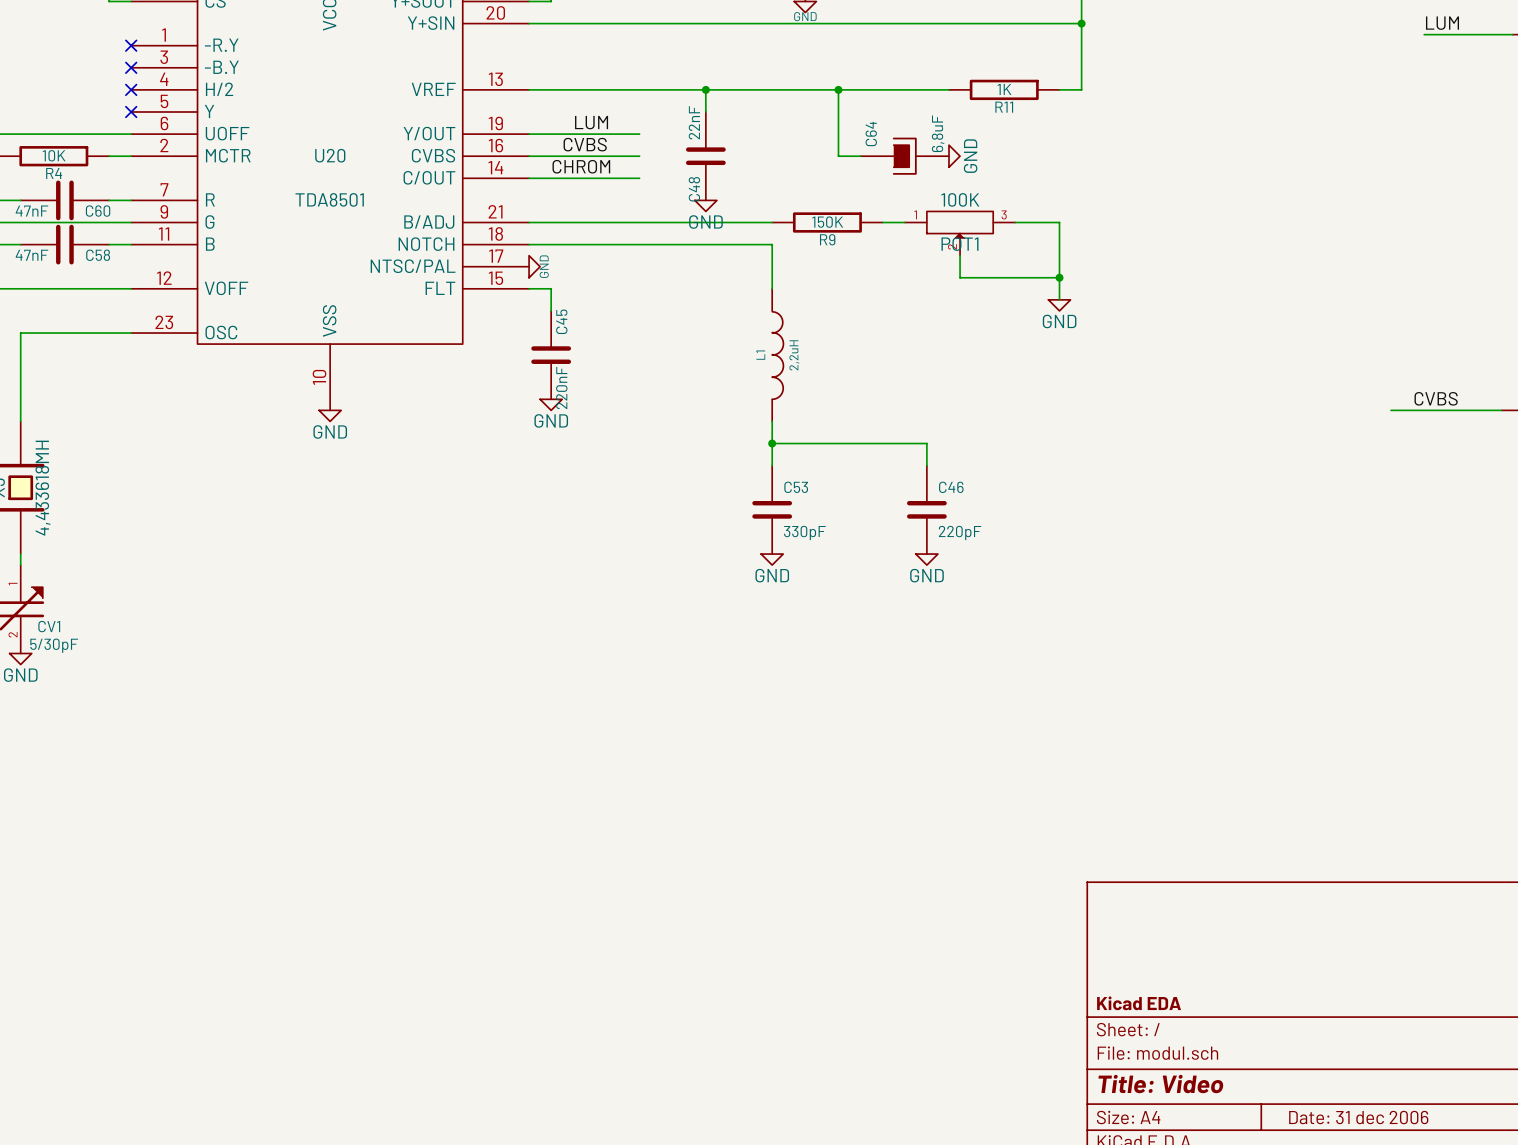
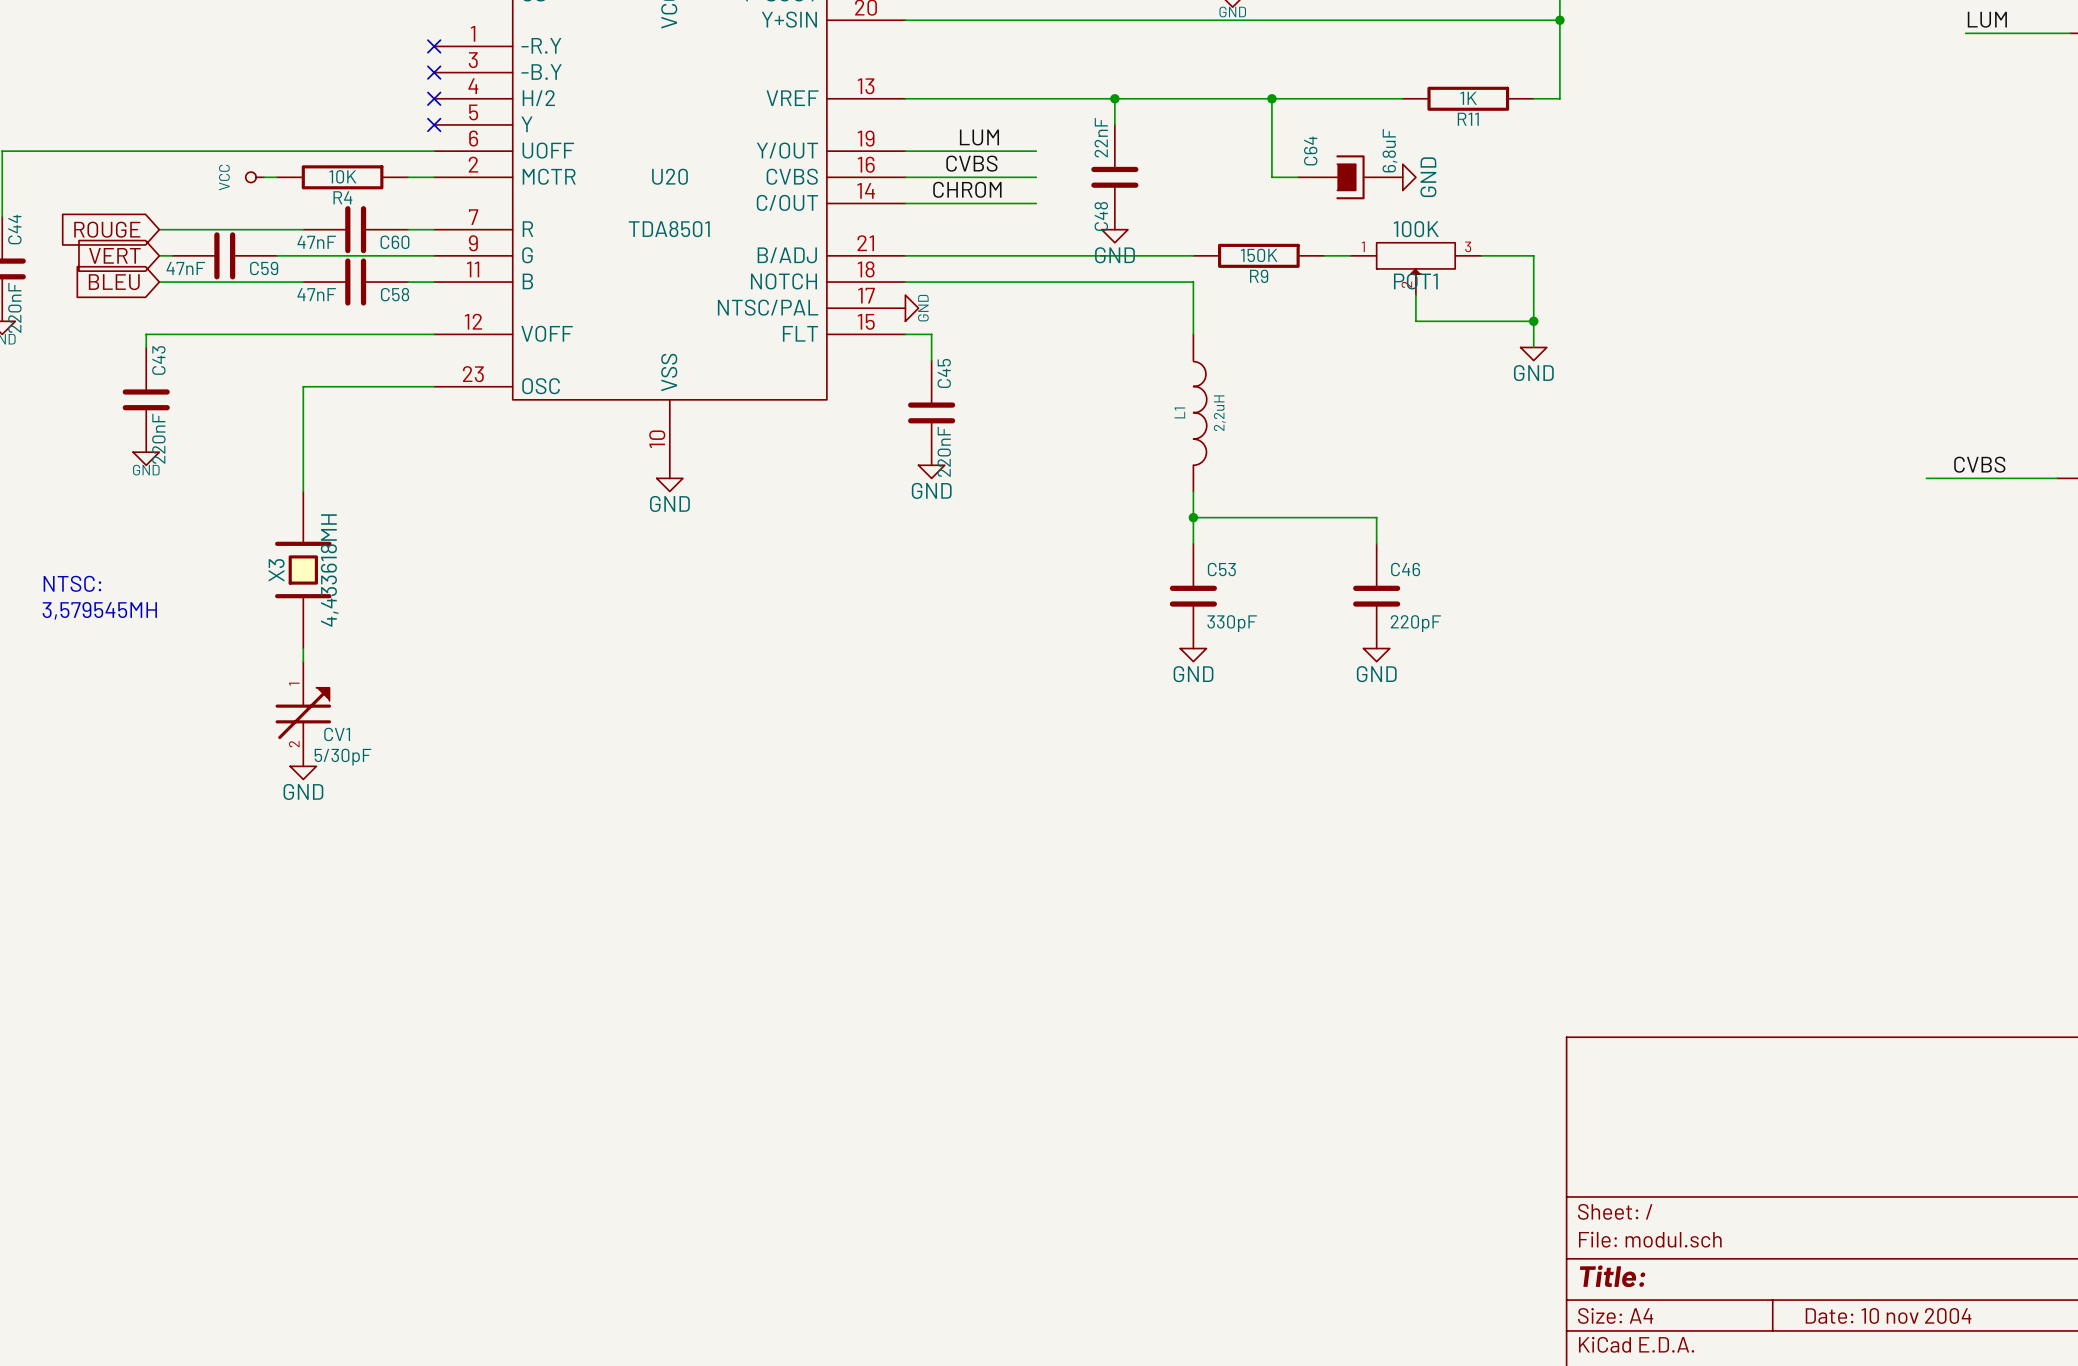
title block: Kicad EDA (1139, 1003) -> none
title block: Title: Video (1160, 1084) -> Title: (1612, 1276)
title block: Date: 31 dec 2006 (1358, 1117) -> Date: 10 nov 2004 (1888, 1315)

